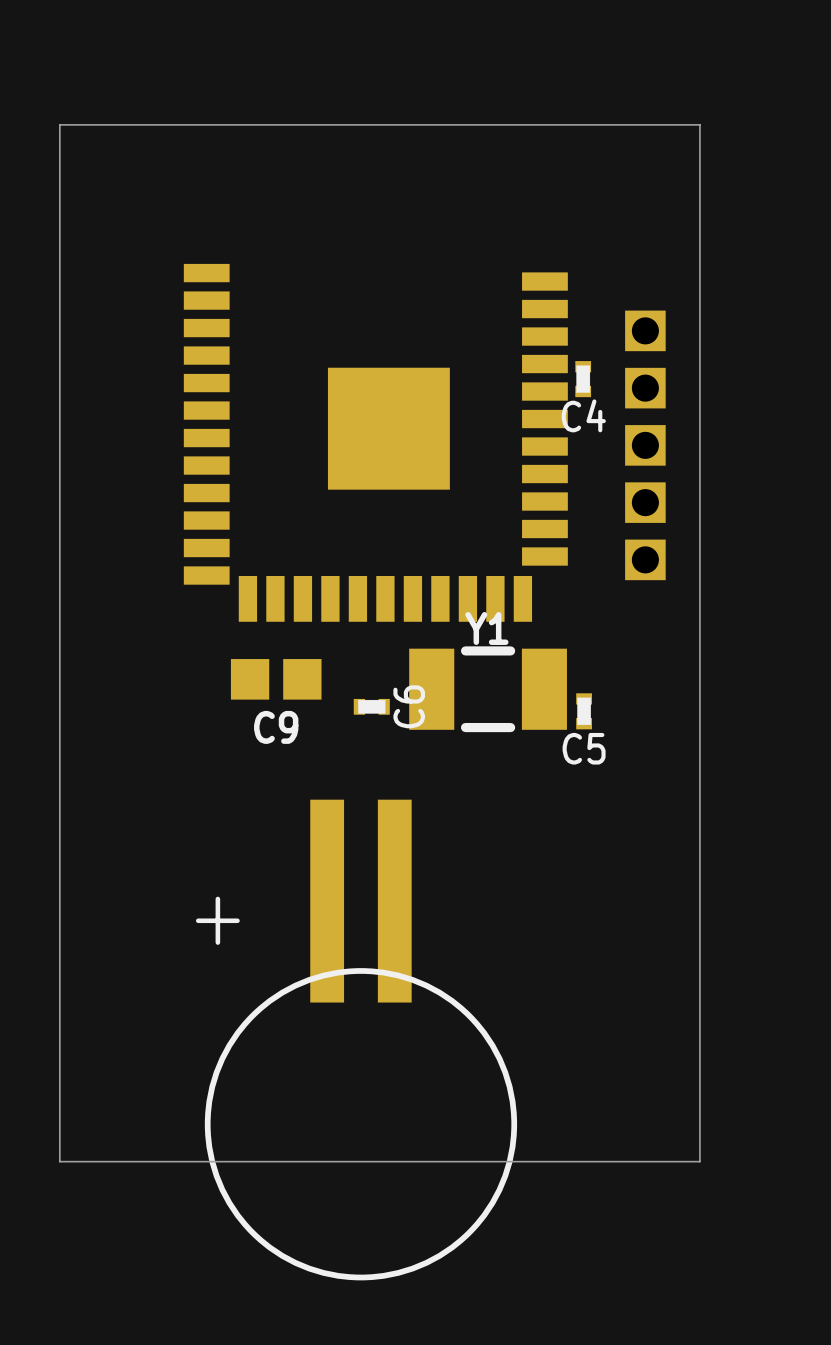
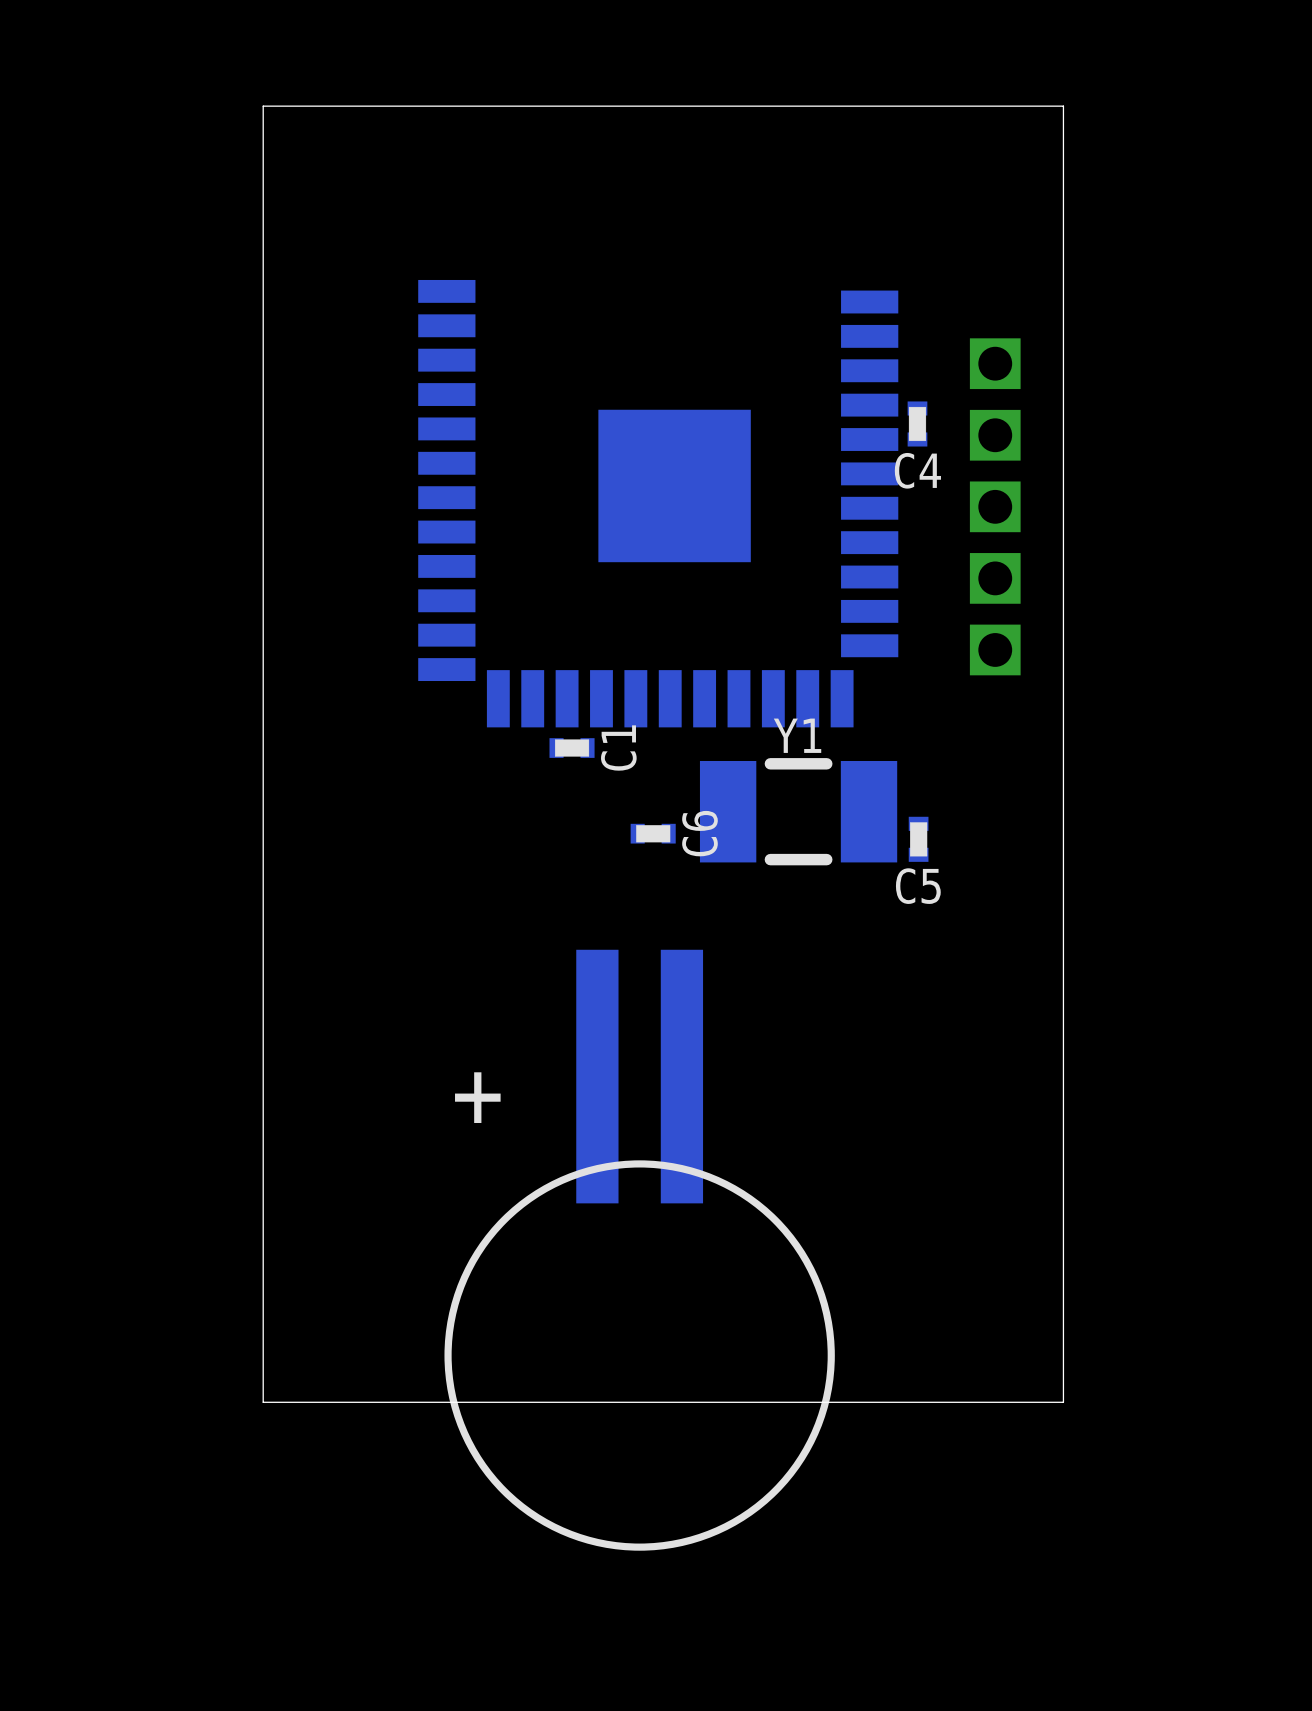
C1: none -> (572, 748)
C9: (276, 679) -> none

